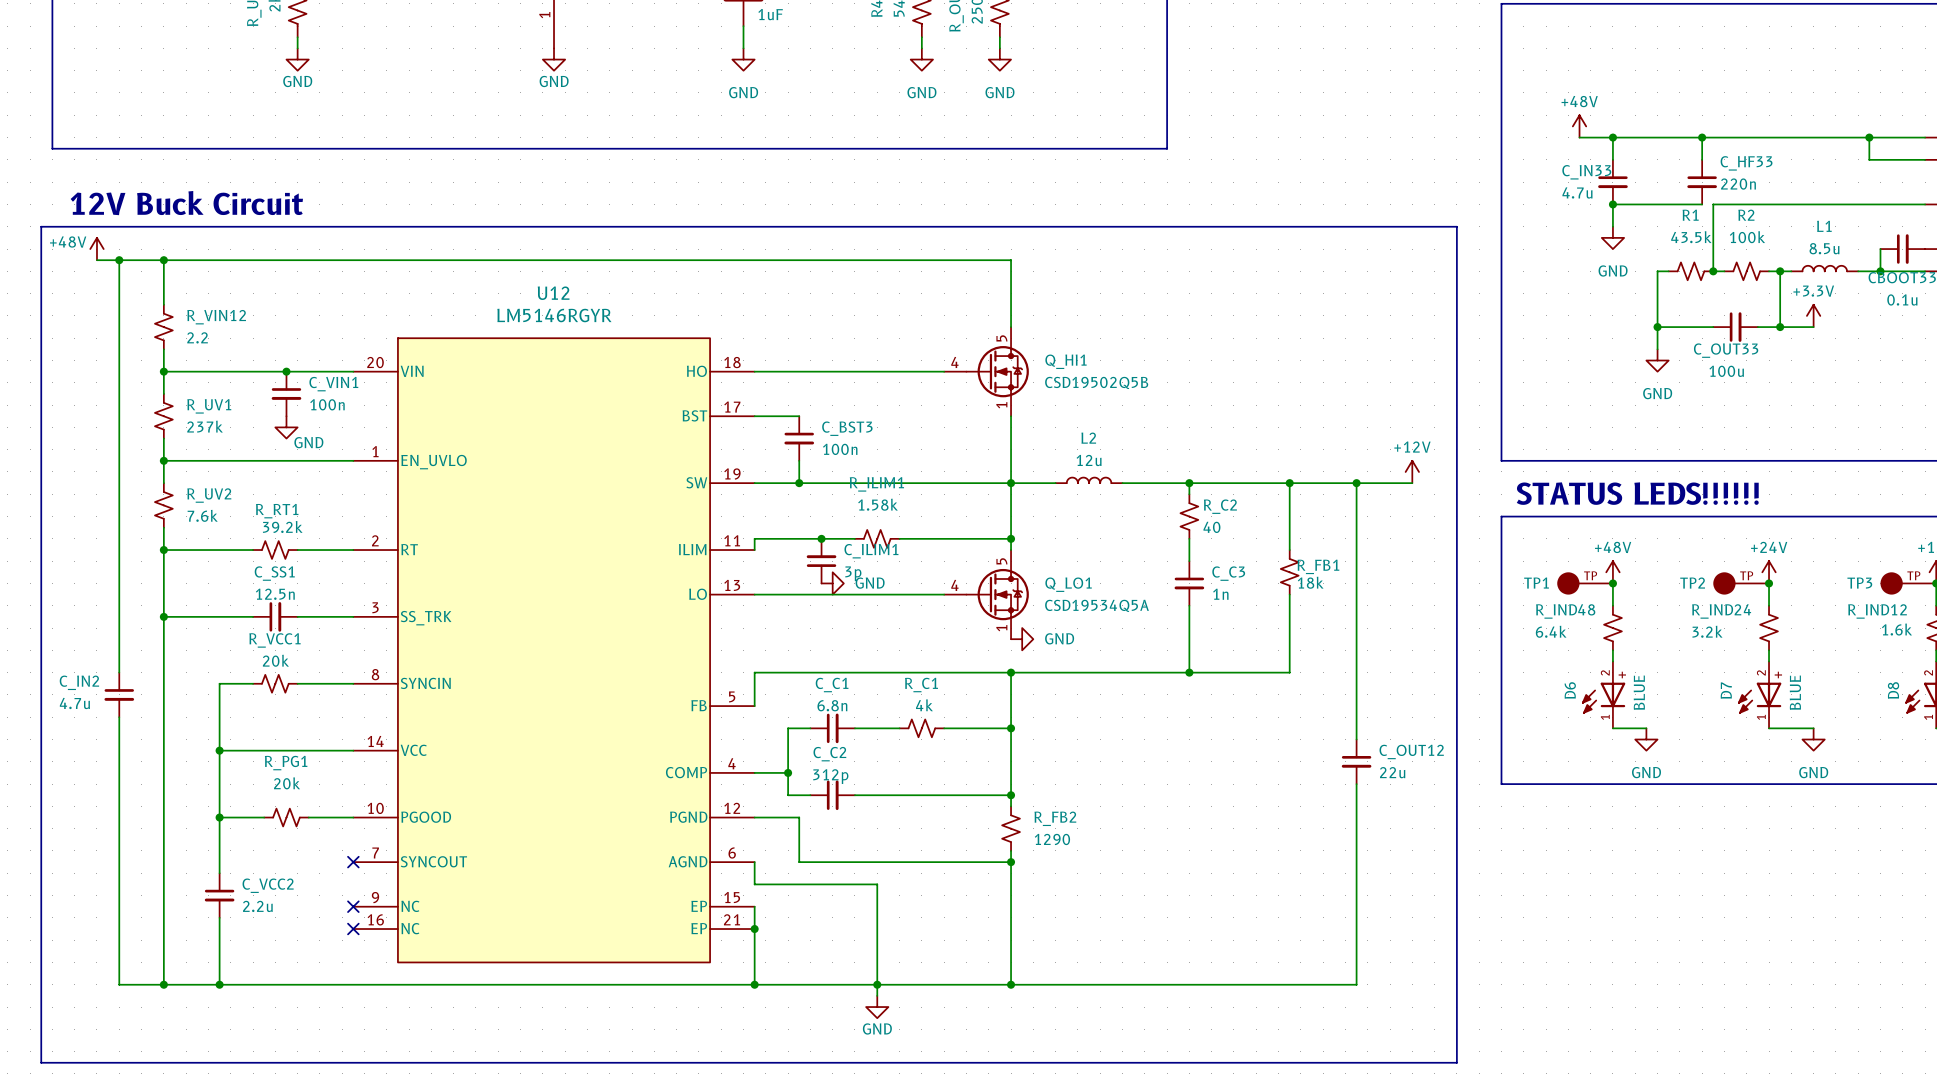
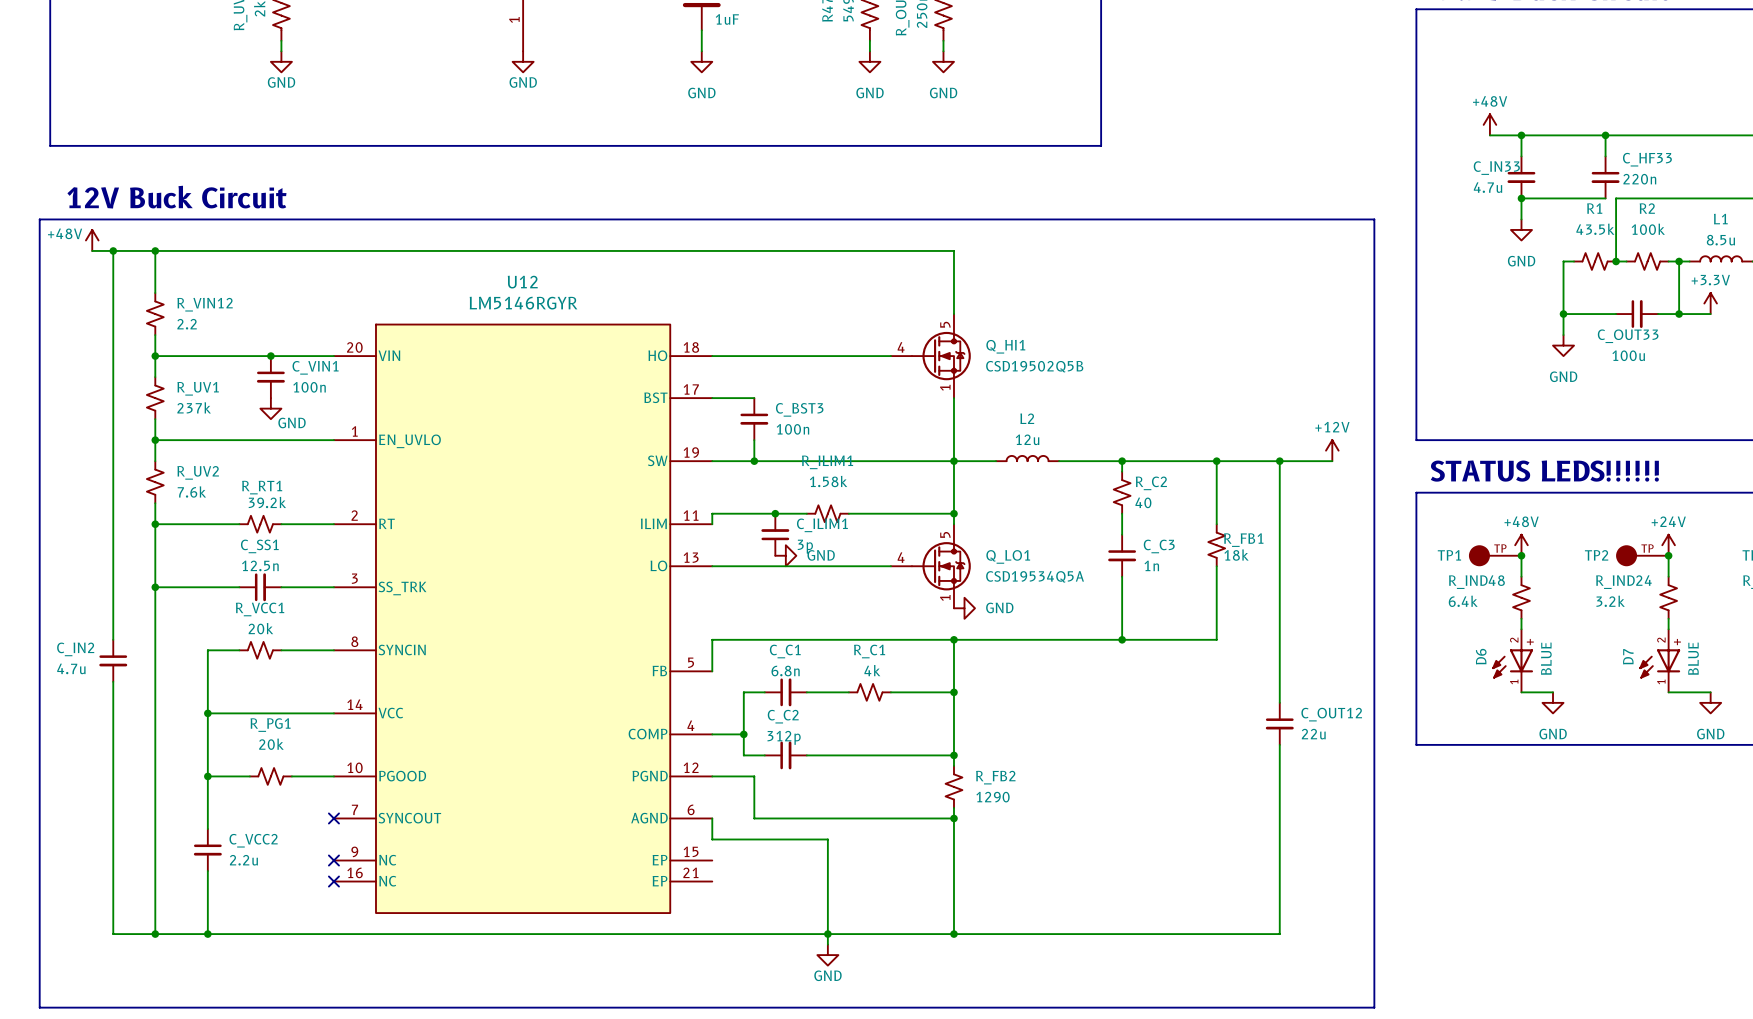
wire: (754, 906) (754, 984) -> none
junction: (754, 929) -> none
junction: (754, 984) -> none

